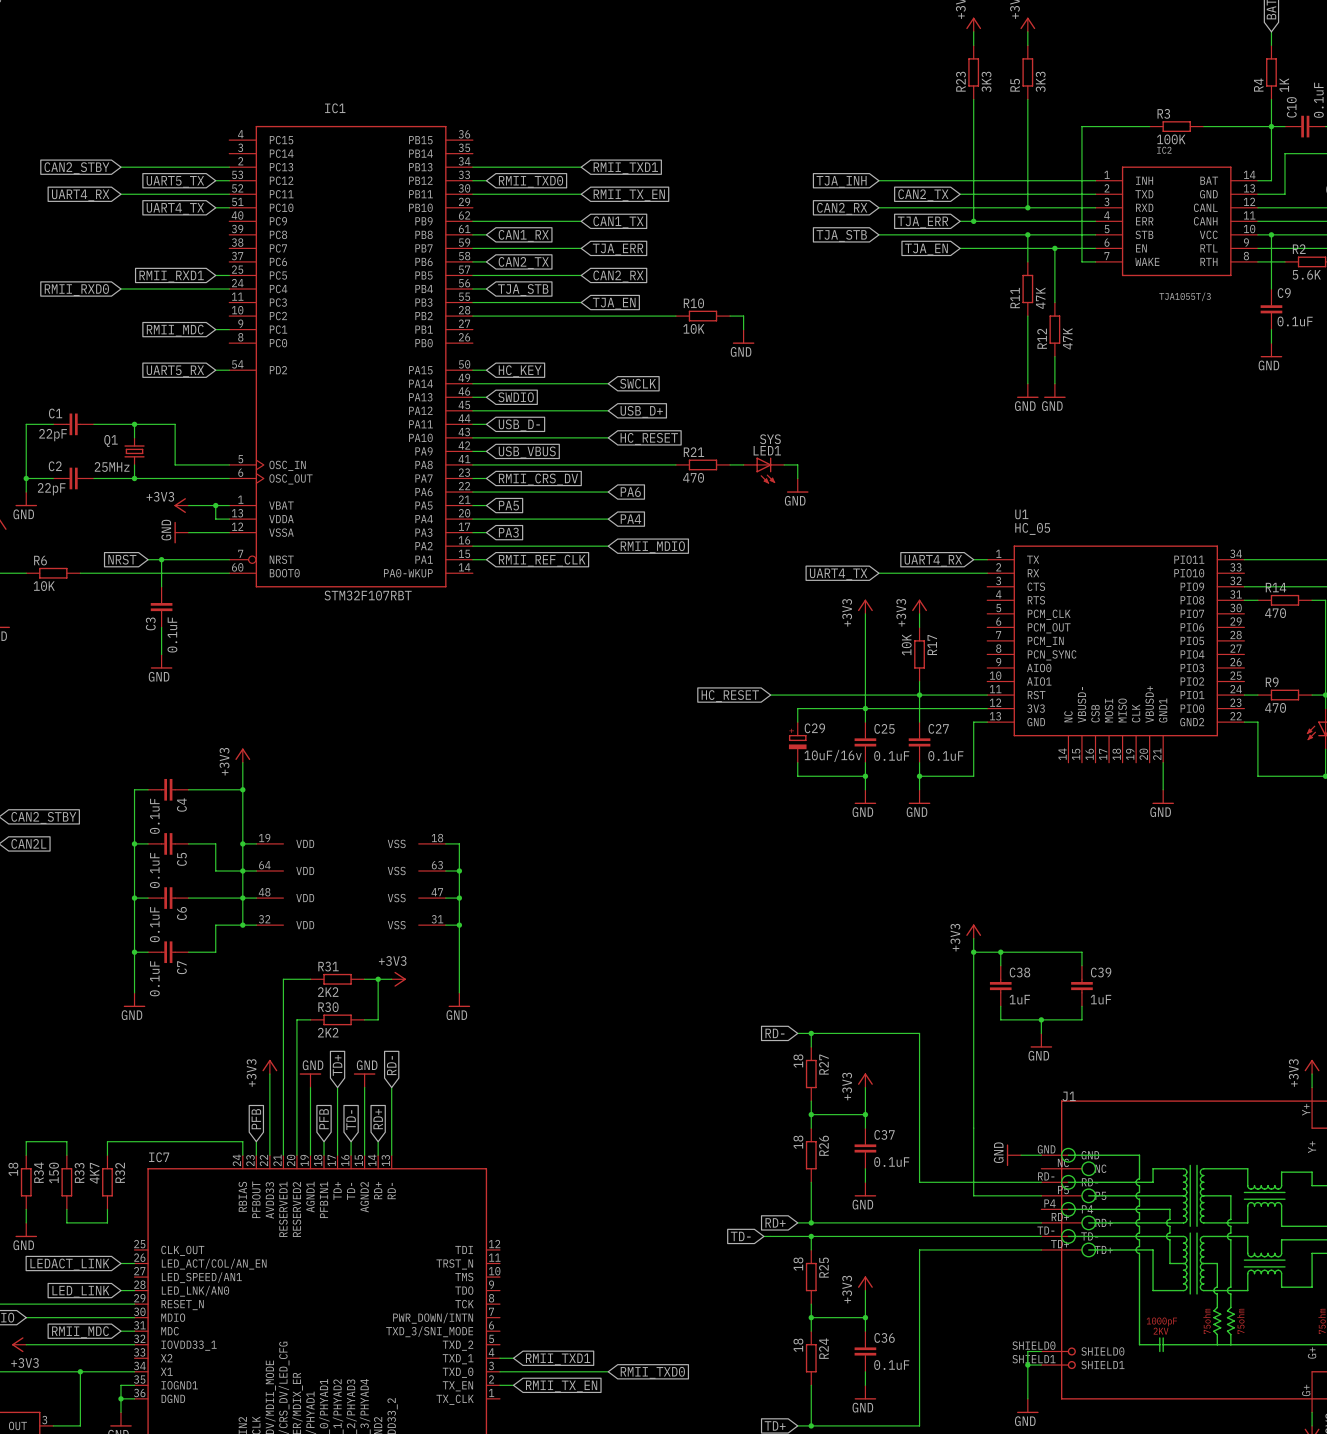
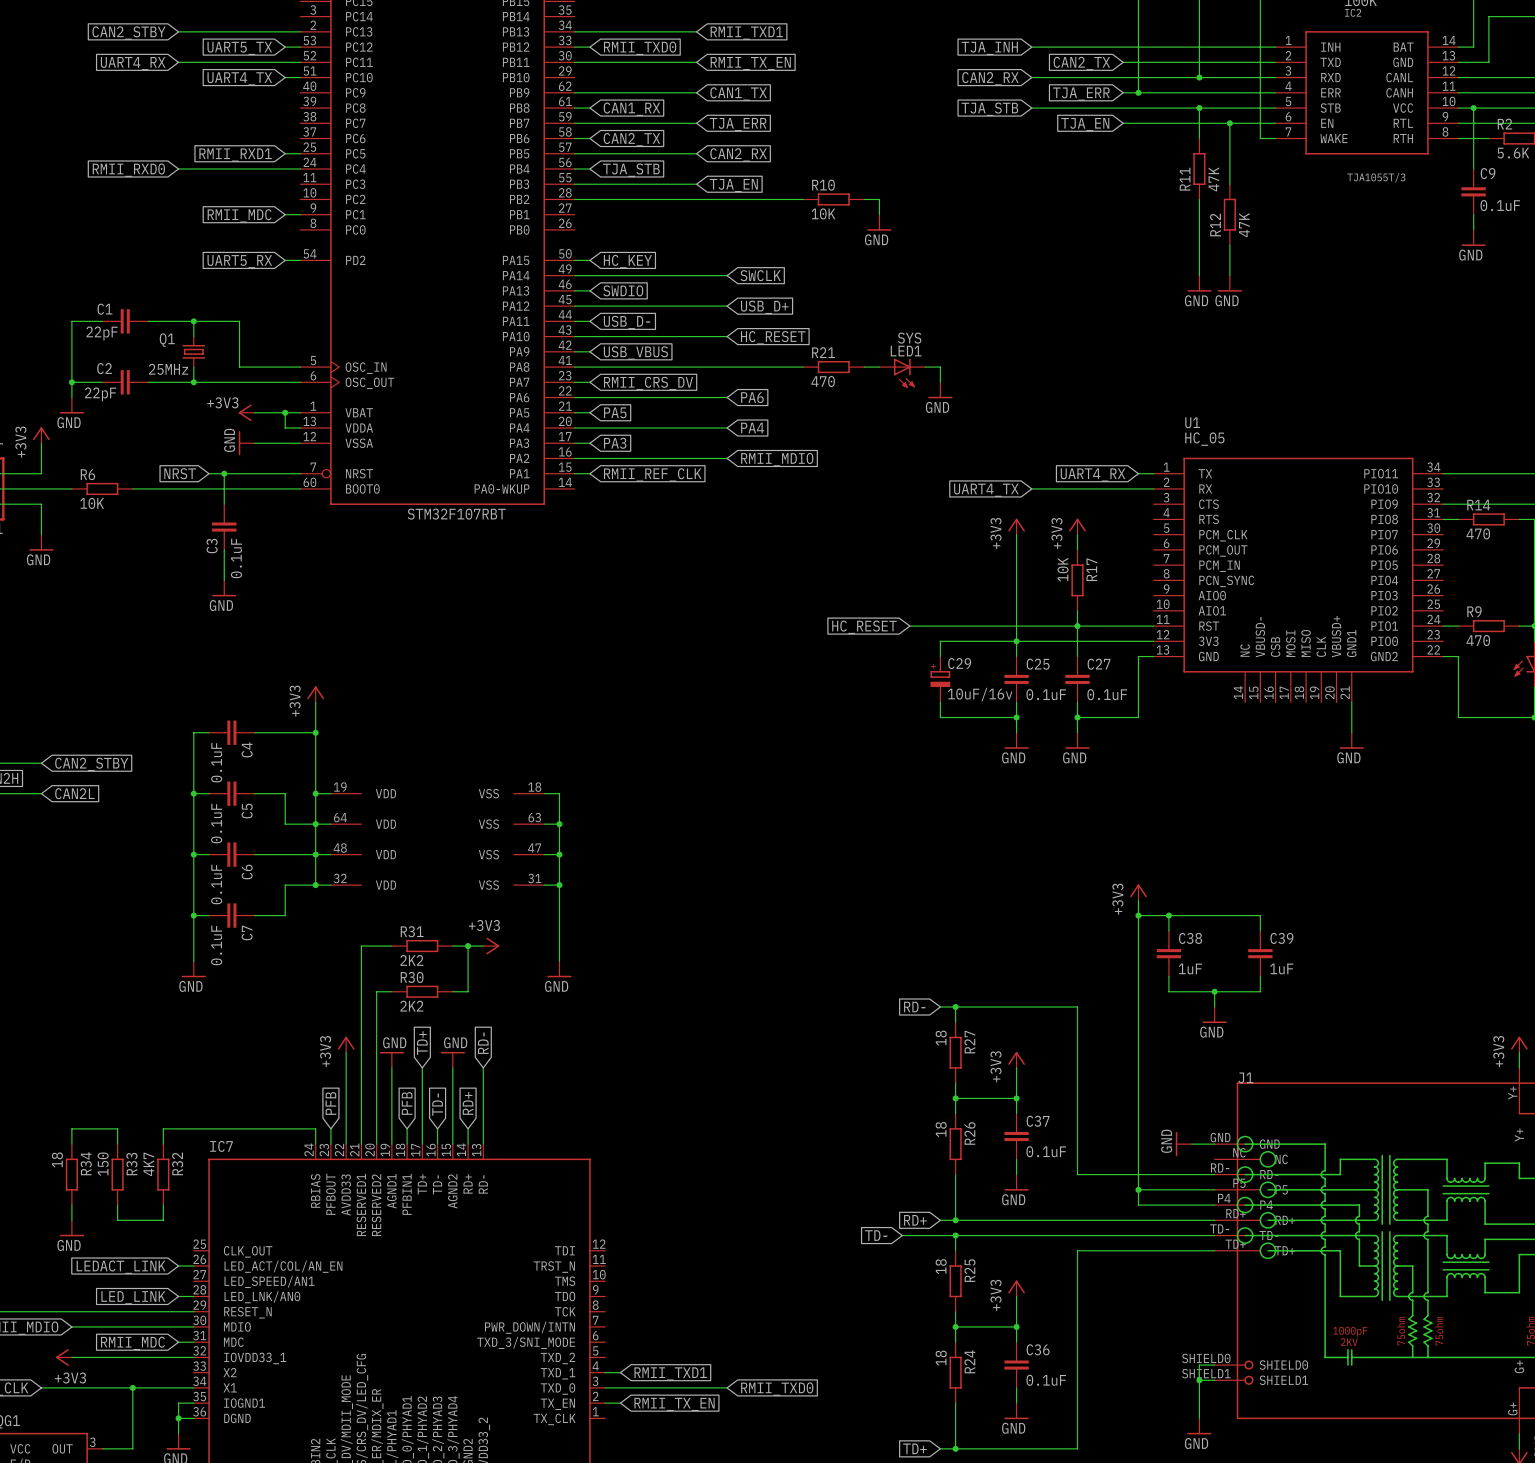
wire: none -> (1138, 1189) (1138, 1205) (1214, 1205)
junction: none -> (1138, 1189)

